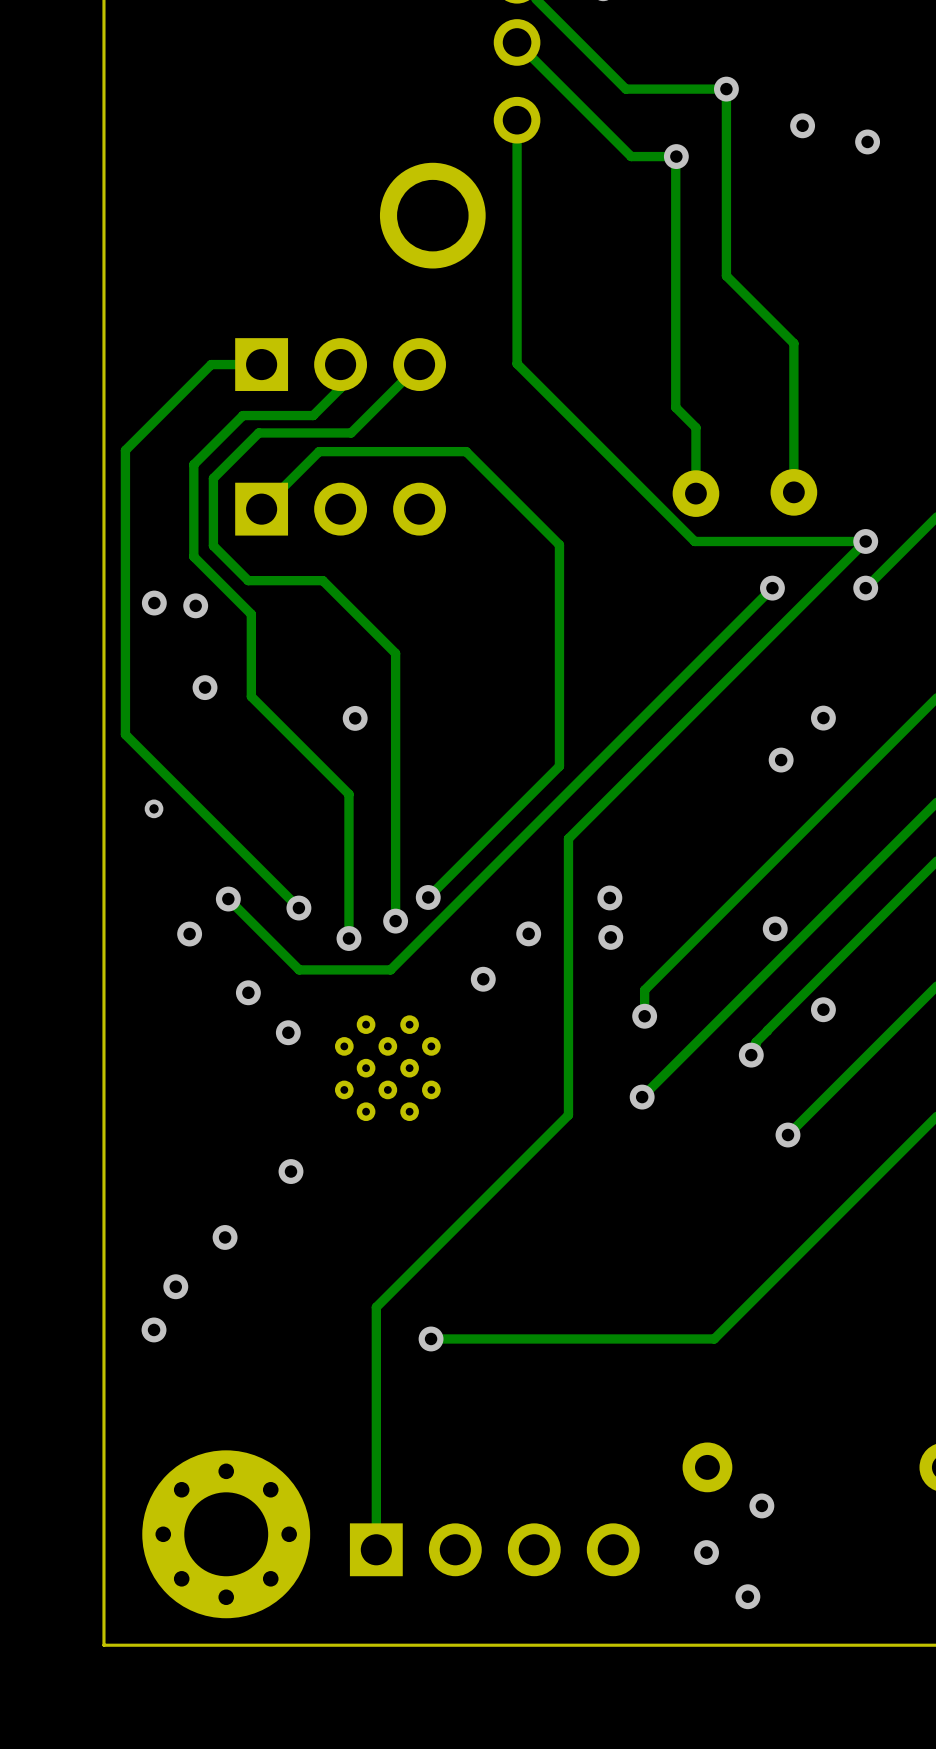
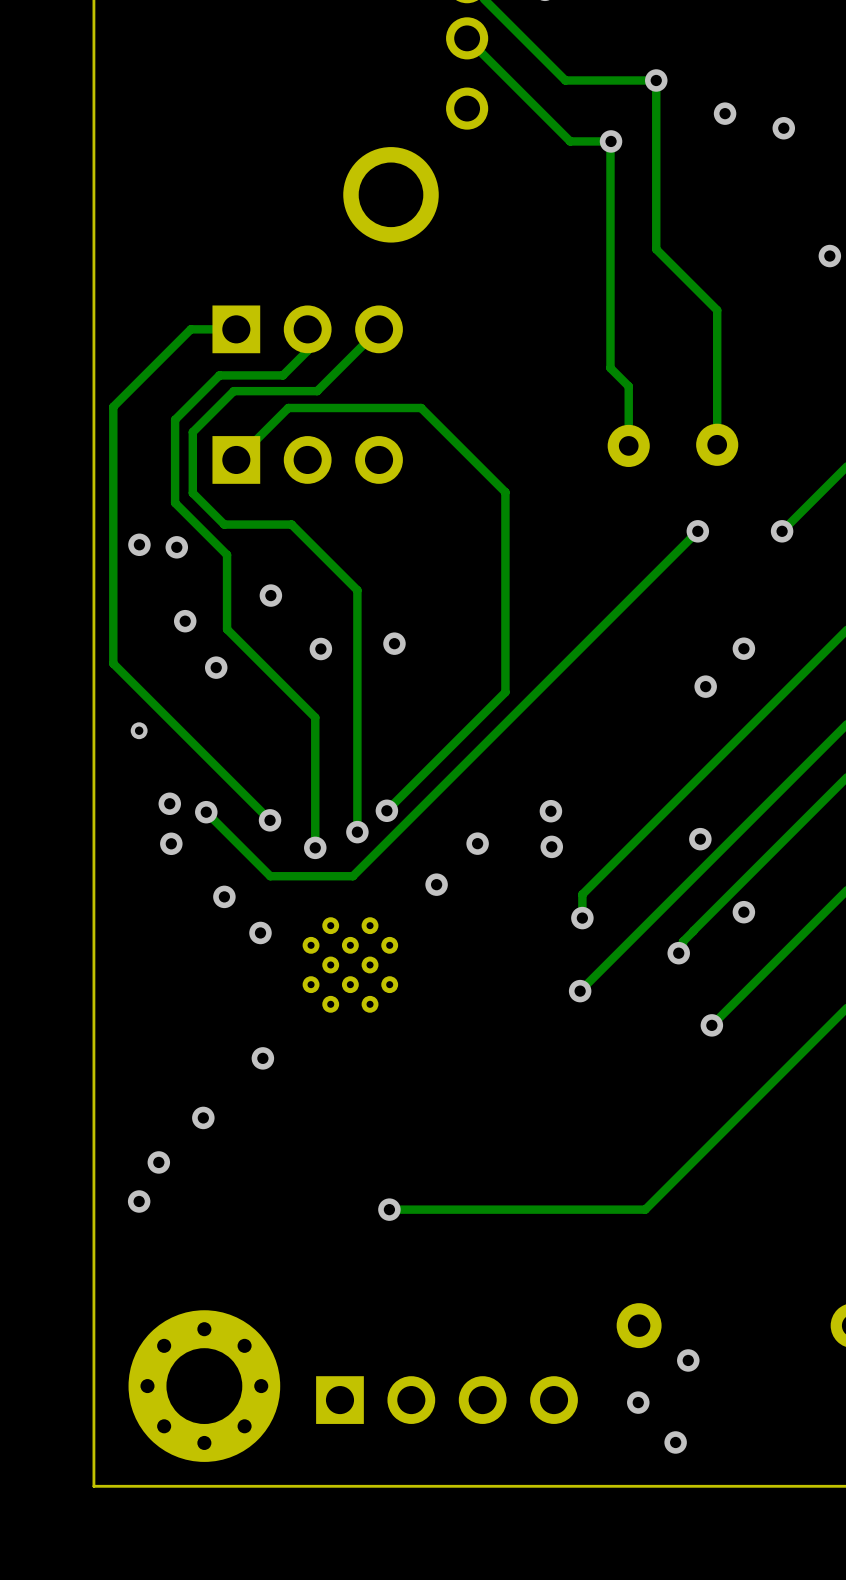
track: (517, 120) (517, 363) (694, 541) (865, 541) (568, 838) (568, 1115) (376, 1307) (376, 1549) -> none
via: none -> (829, 256)
via: (865, 541) -> none
via: none -> (270, 595)
via: none -> (394, 643)
via: none -> (216, 667)
via: none -> (169, 803)

